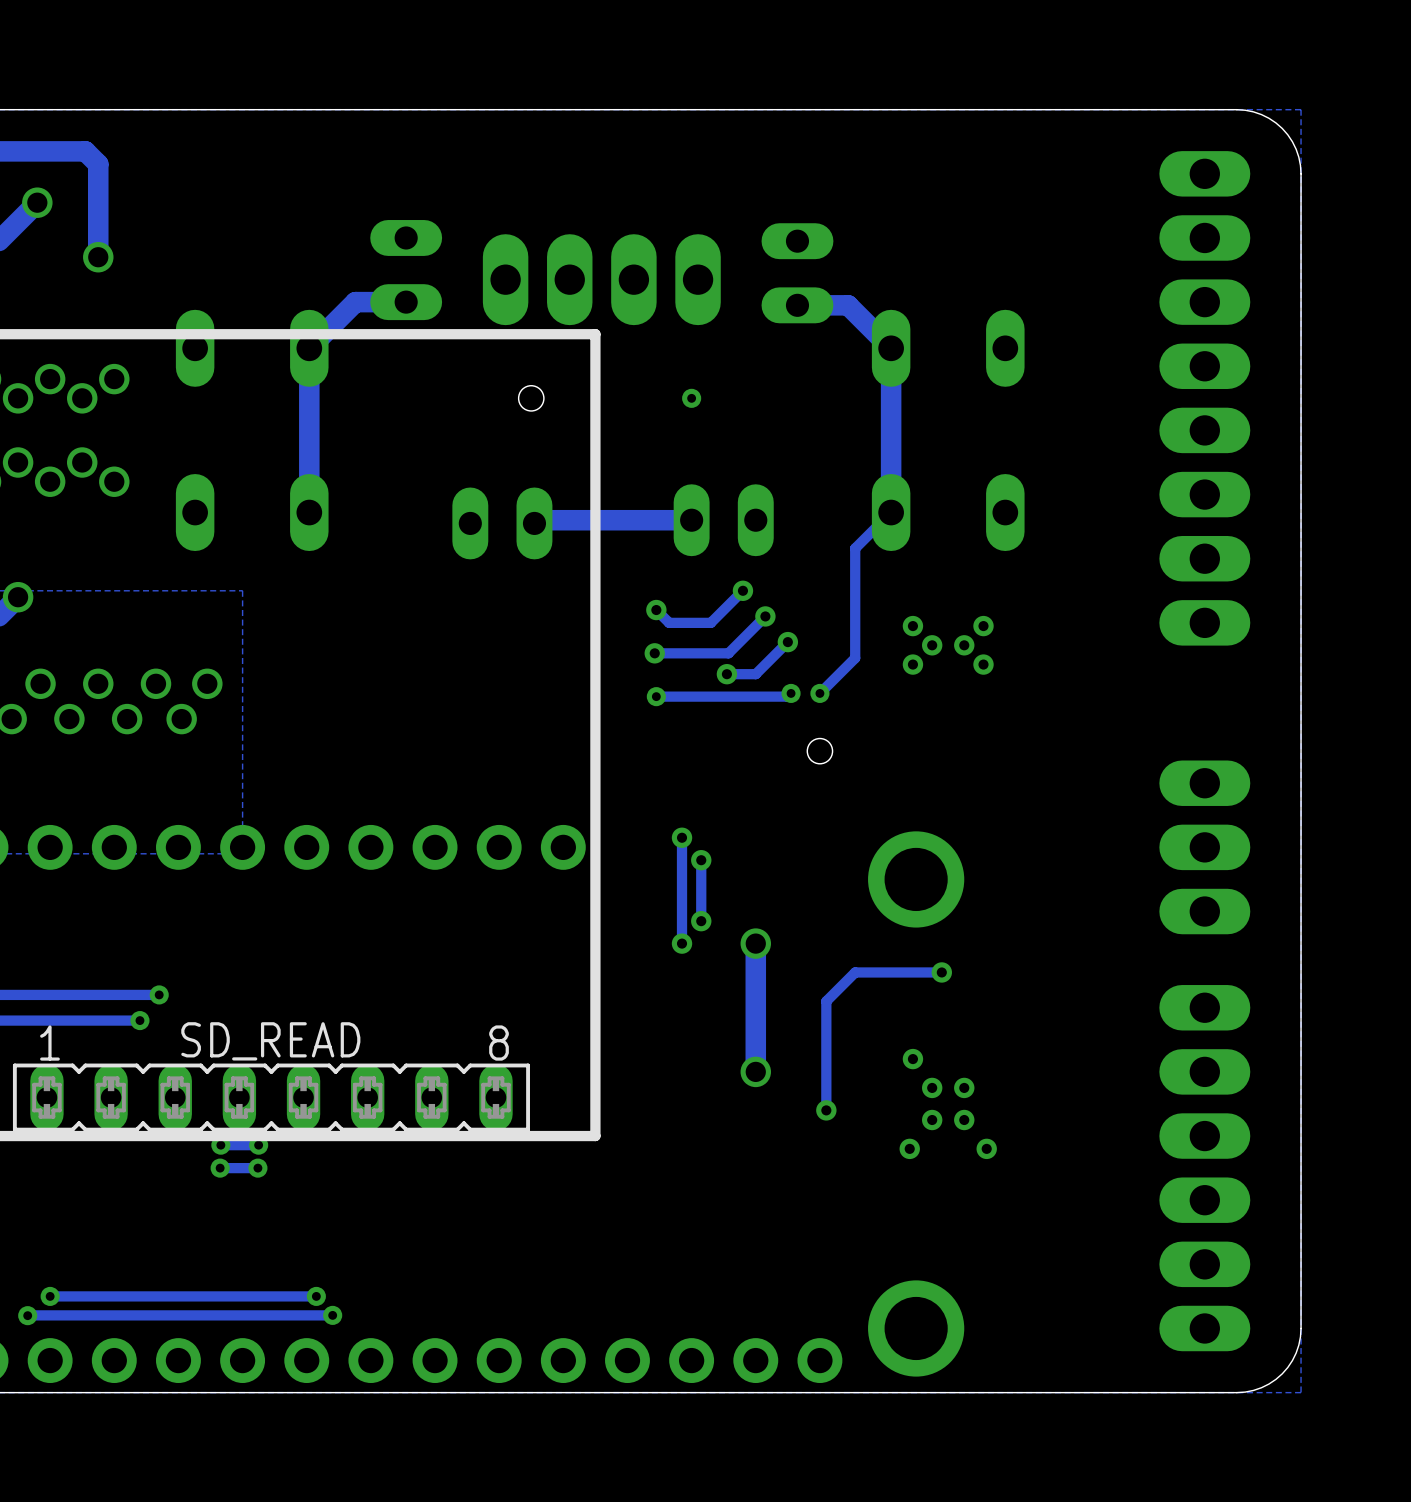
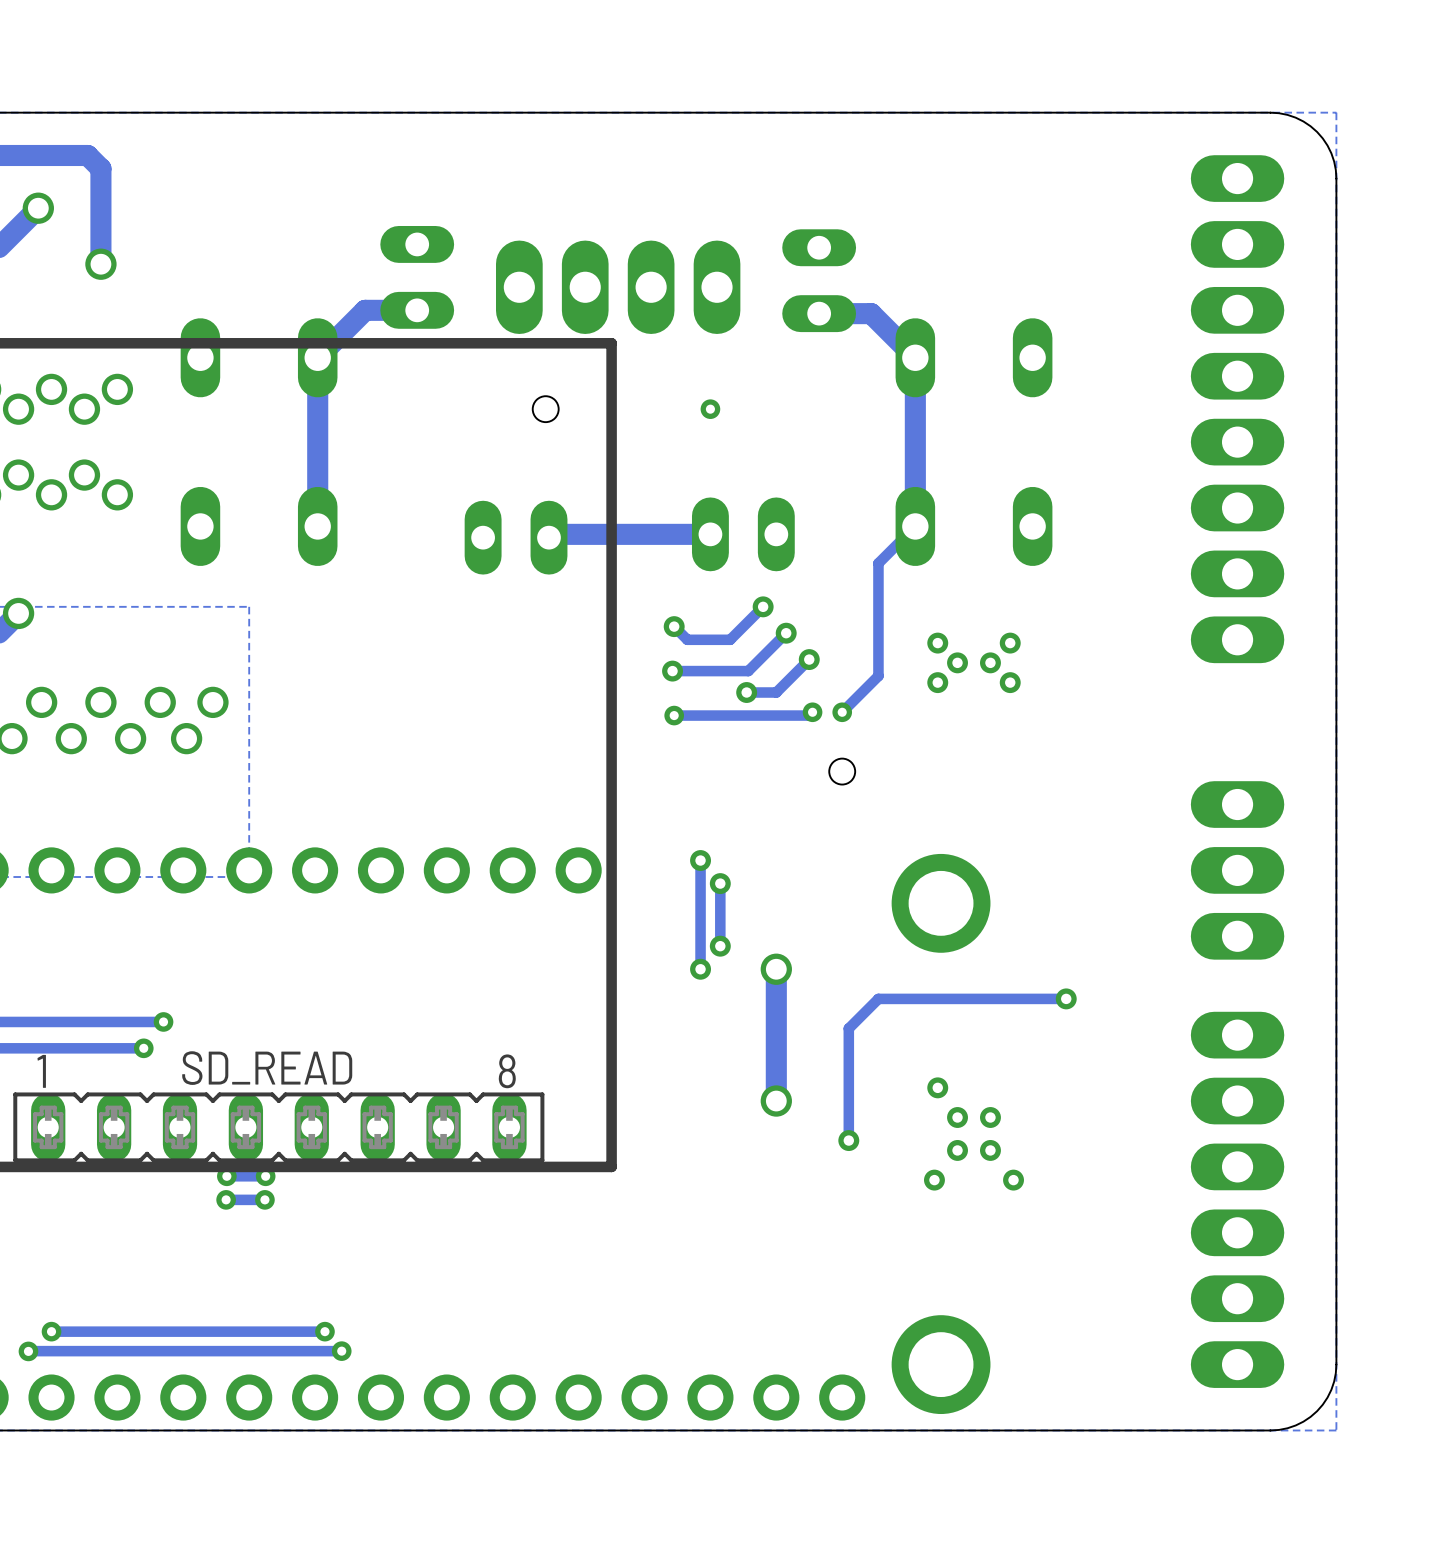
via position: (941, 972) -> (1066, 998)
track: none -> (1066, 998) (967, 998)

